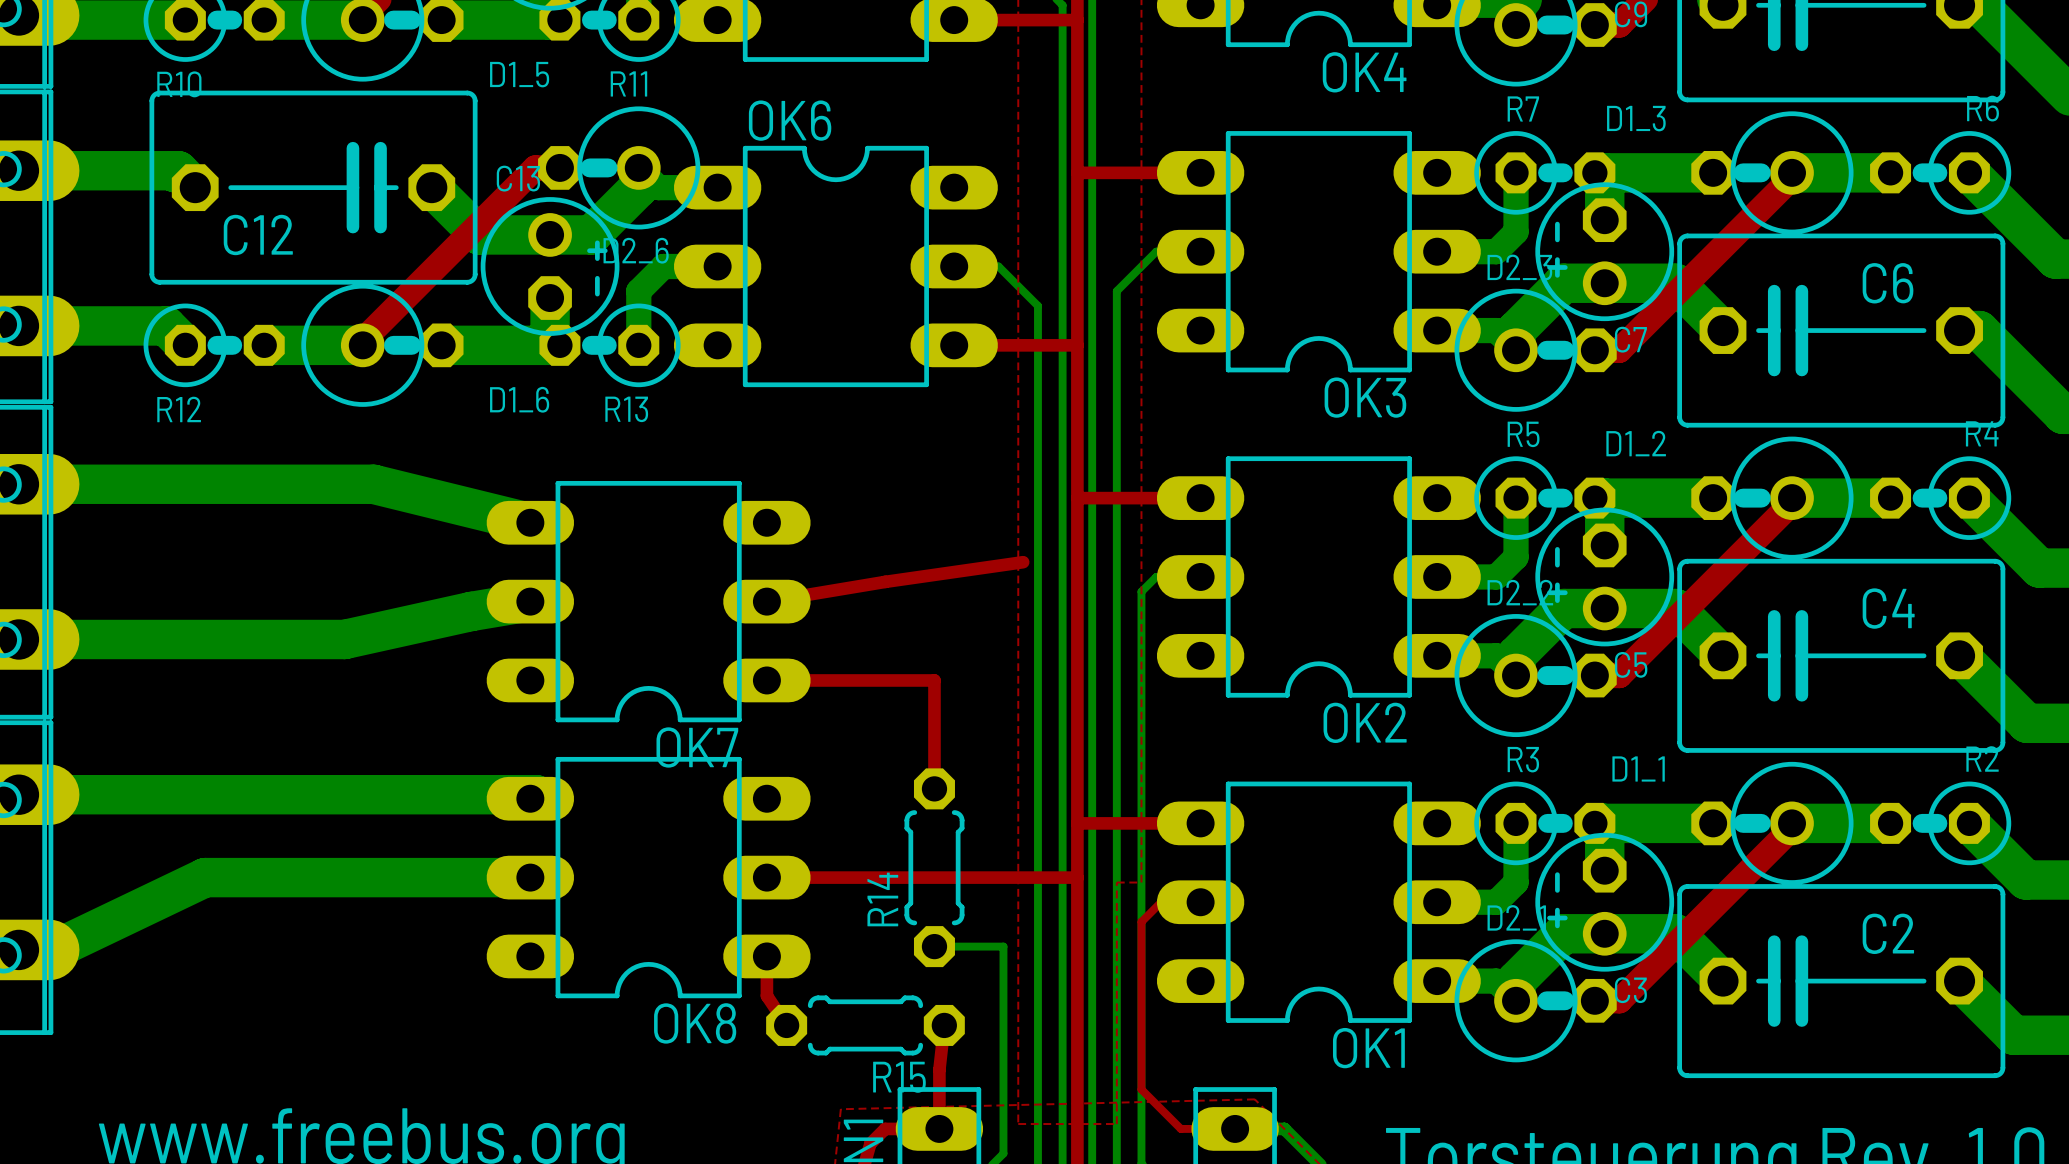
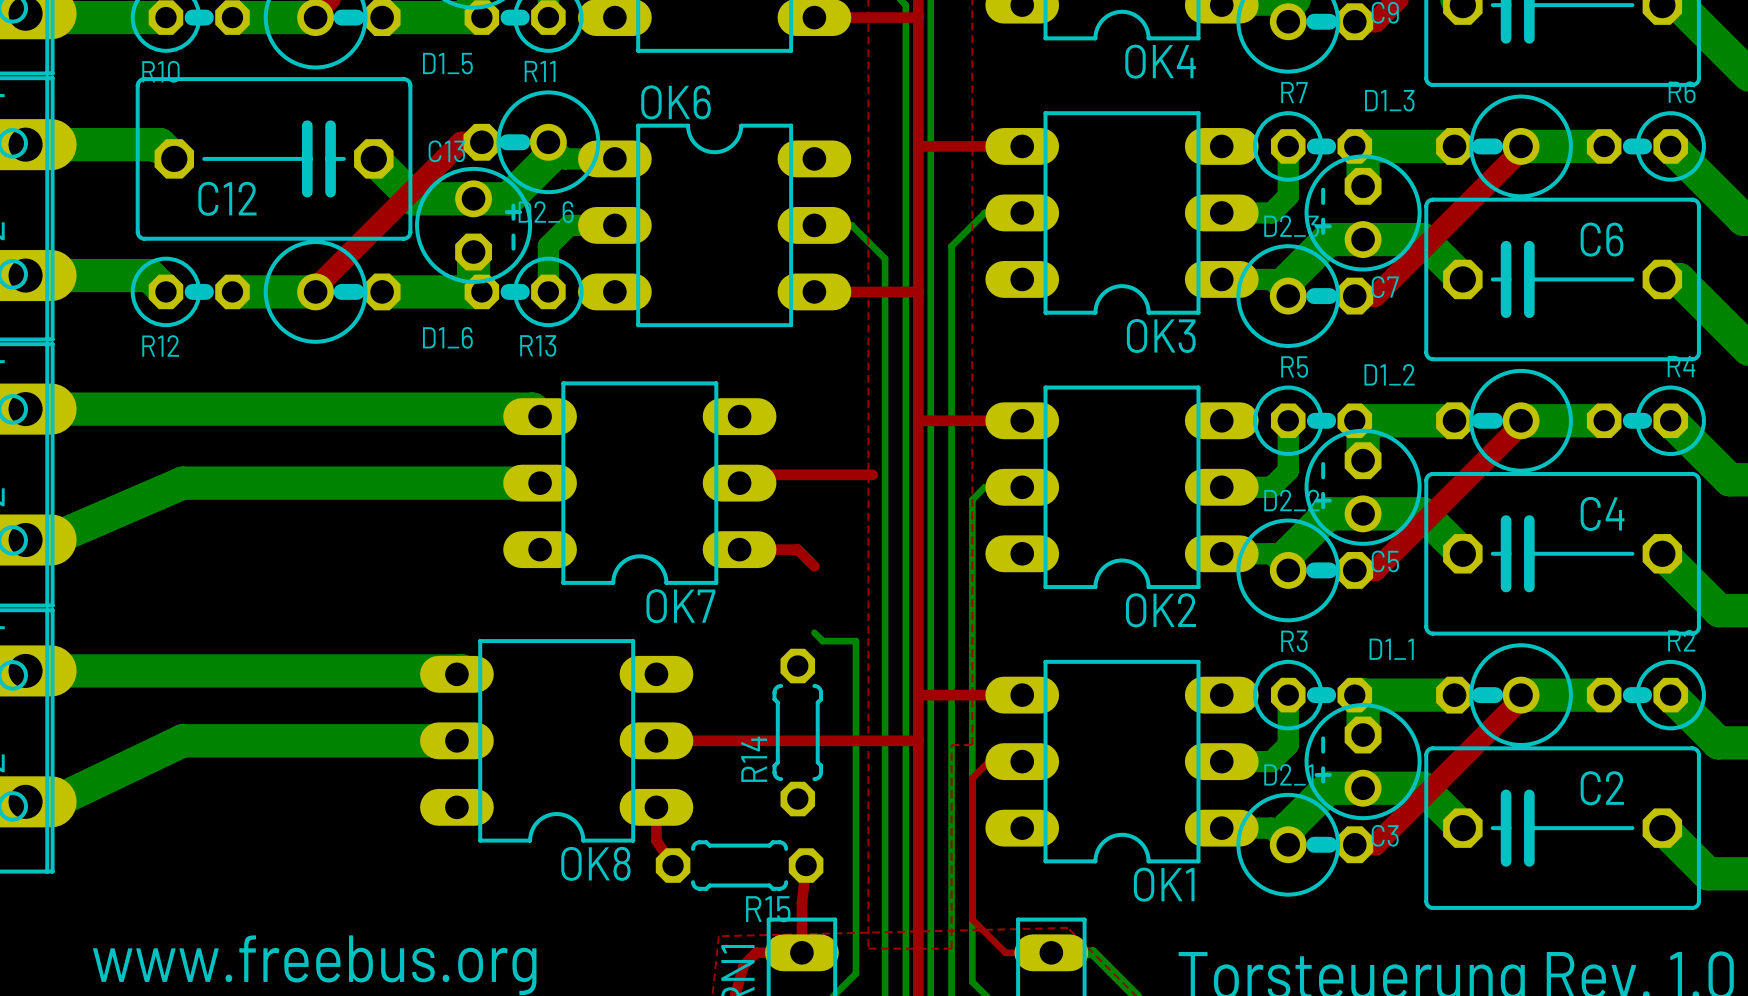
bottom track: (373, 484) (530, 522) -> (324, 409) (532, 409) (540, 416)
top track: (1023, 562) (766, 601) -> (872, 474) (747, 474) (739, 483)
bottom track: (530, 601) (471, 611) (344, 639) (48, 639) -> (540, 483) (182, 483) (50, 540)
OK7 position: (648, 601) -> (639, 483)
top track: none -> (739, 549) (797, 549) (814, 566)
top track: (766, 680) (934, 680) (934, 788) -> none
bottom track: (934, 946) (1003, 946) -> (814, 632) (822, 641) (855, 641) (855, 799)

